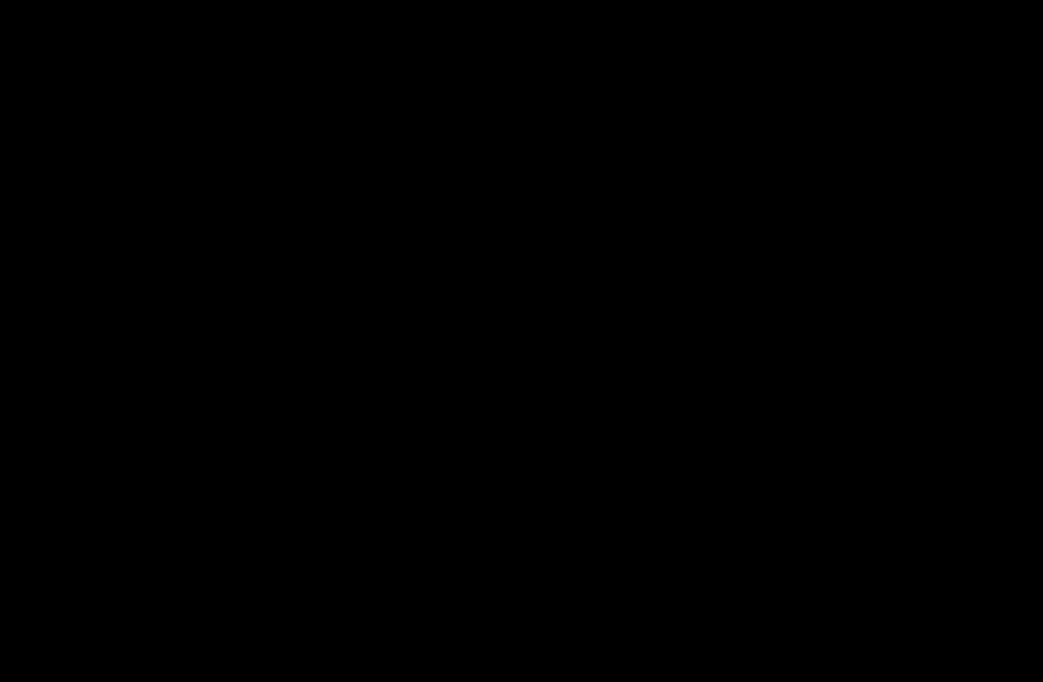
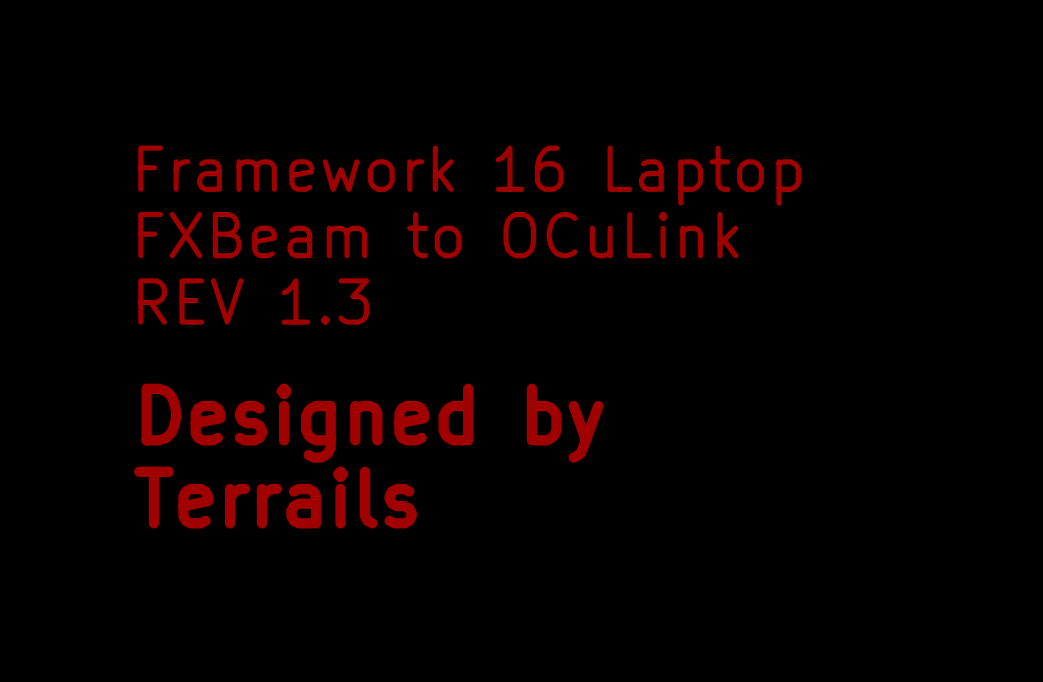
text: none -> Framework 16 Laptop (469, 175)
text: none -> FXBeam to OCuLink (438, 235)
text: none -> REV 1.3 (253, 301)
text: none -> Designed by (372, 423)
text: none -> Terrails (275, 497)

